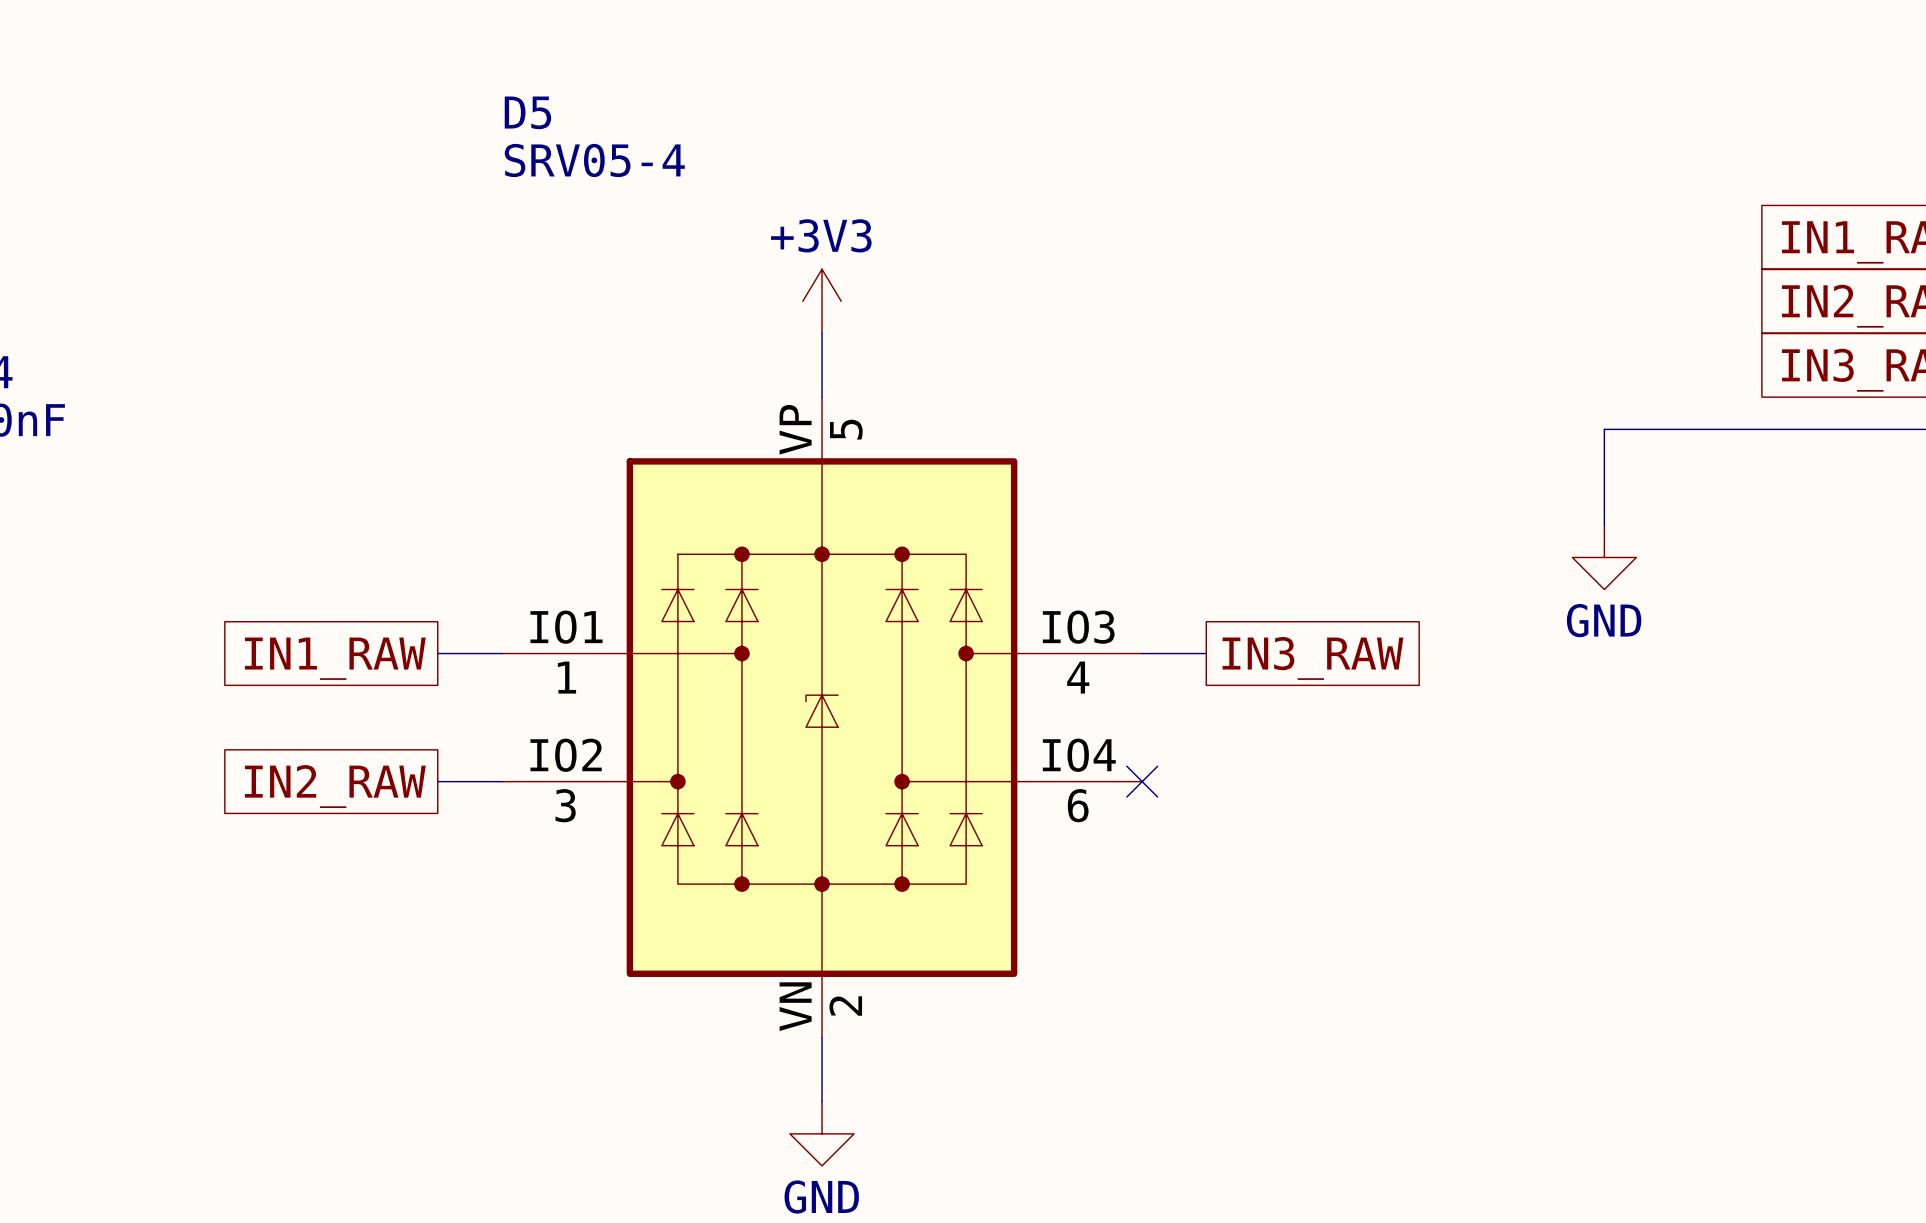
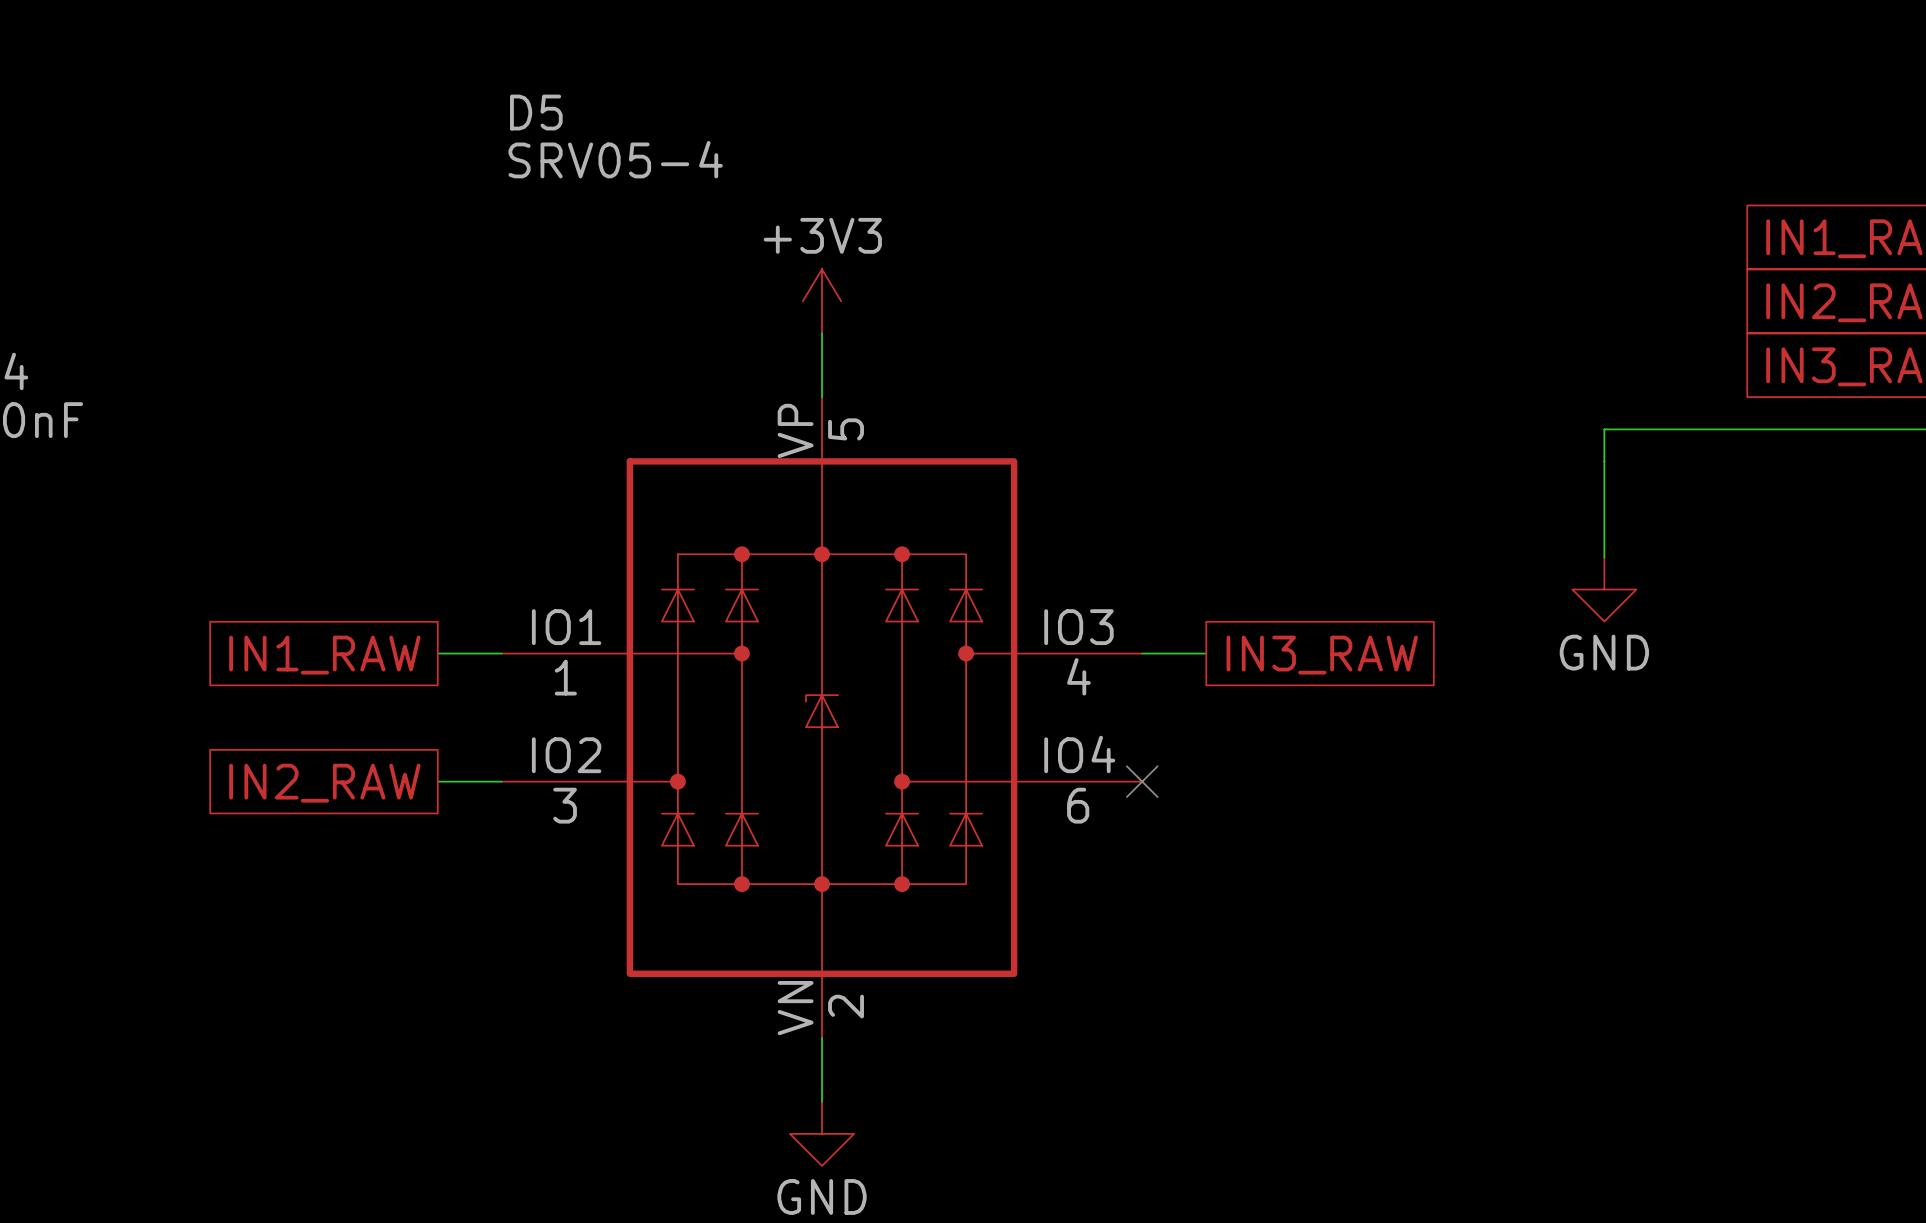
power symbol position: GND (1604, 557) -> GND (1604, 589)

